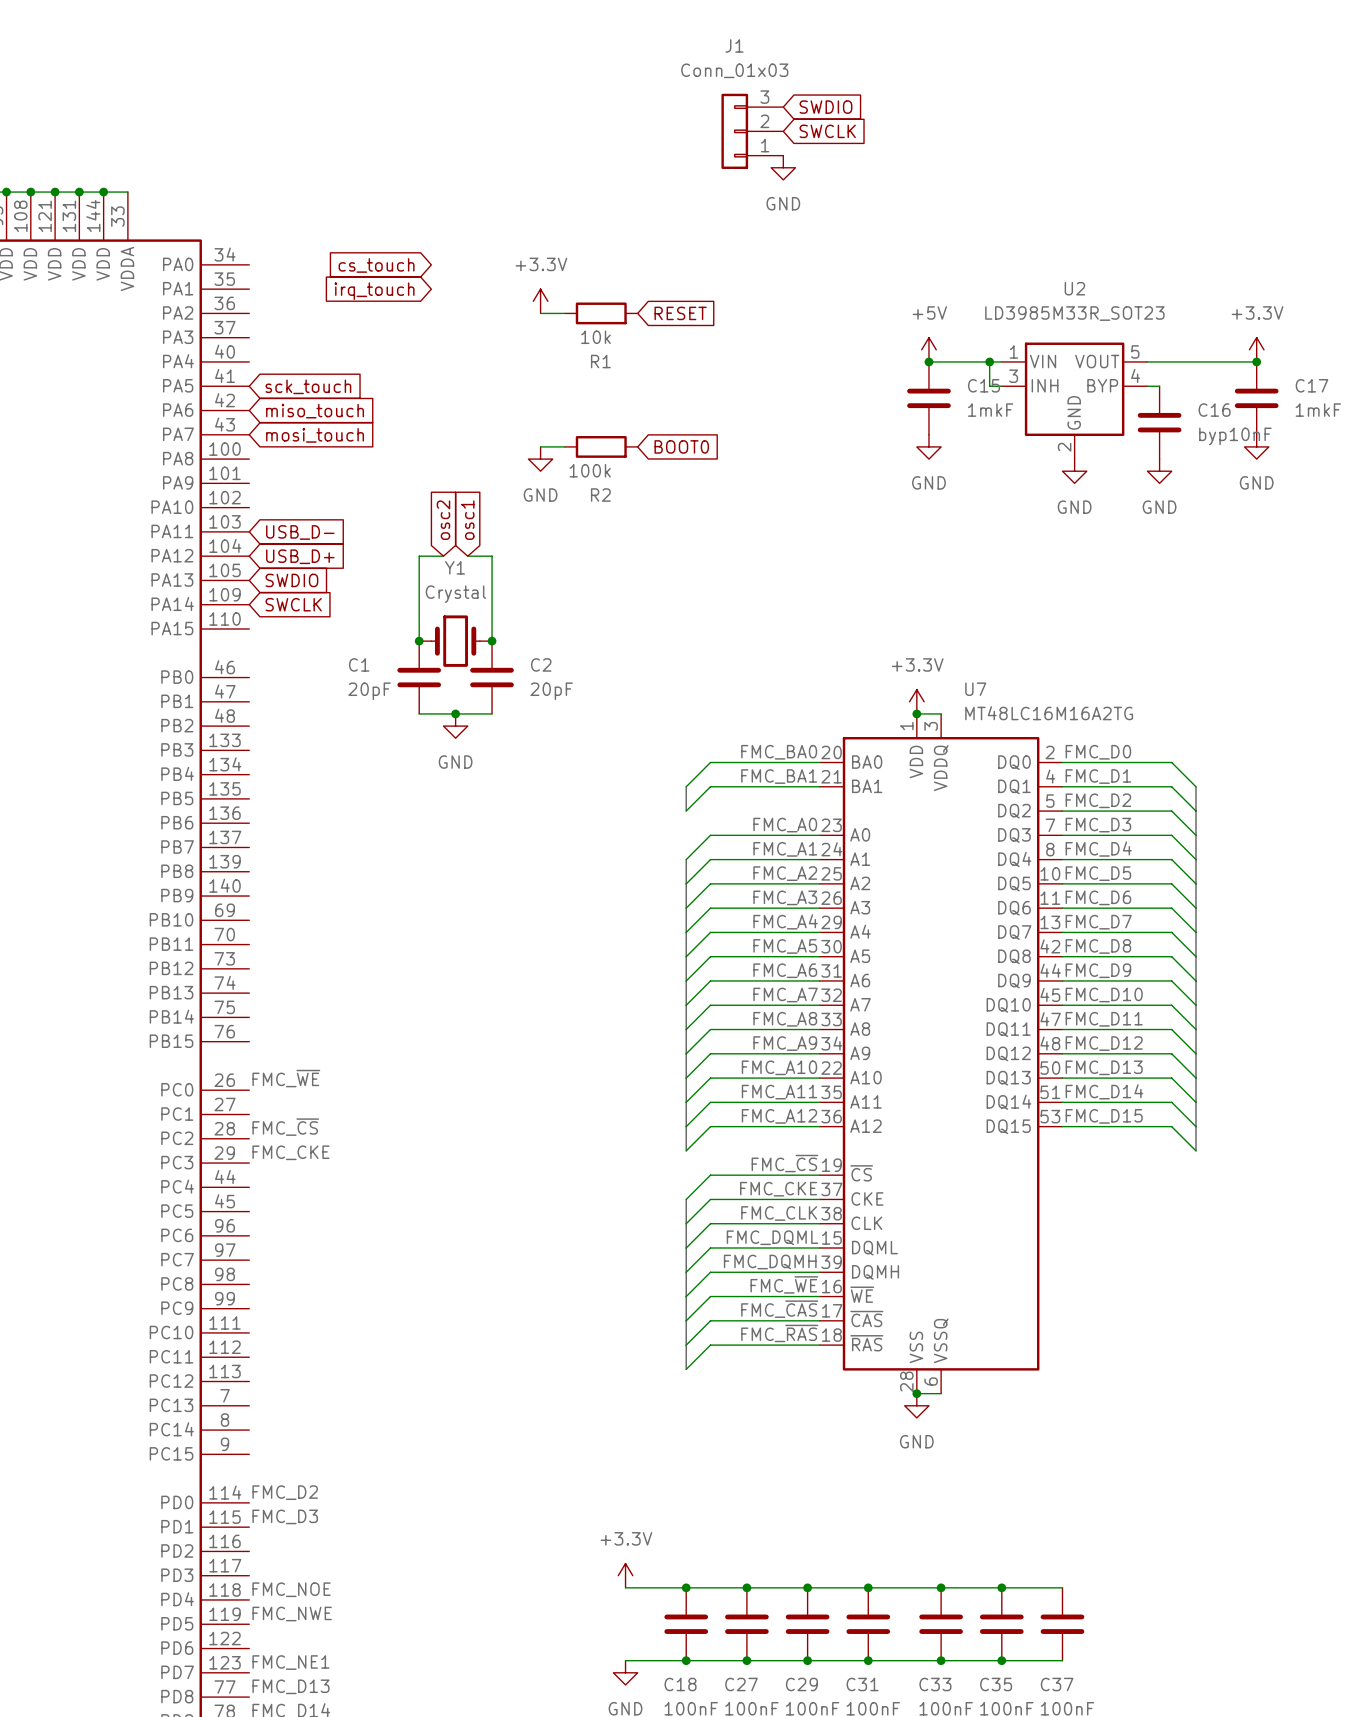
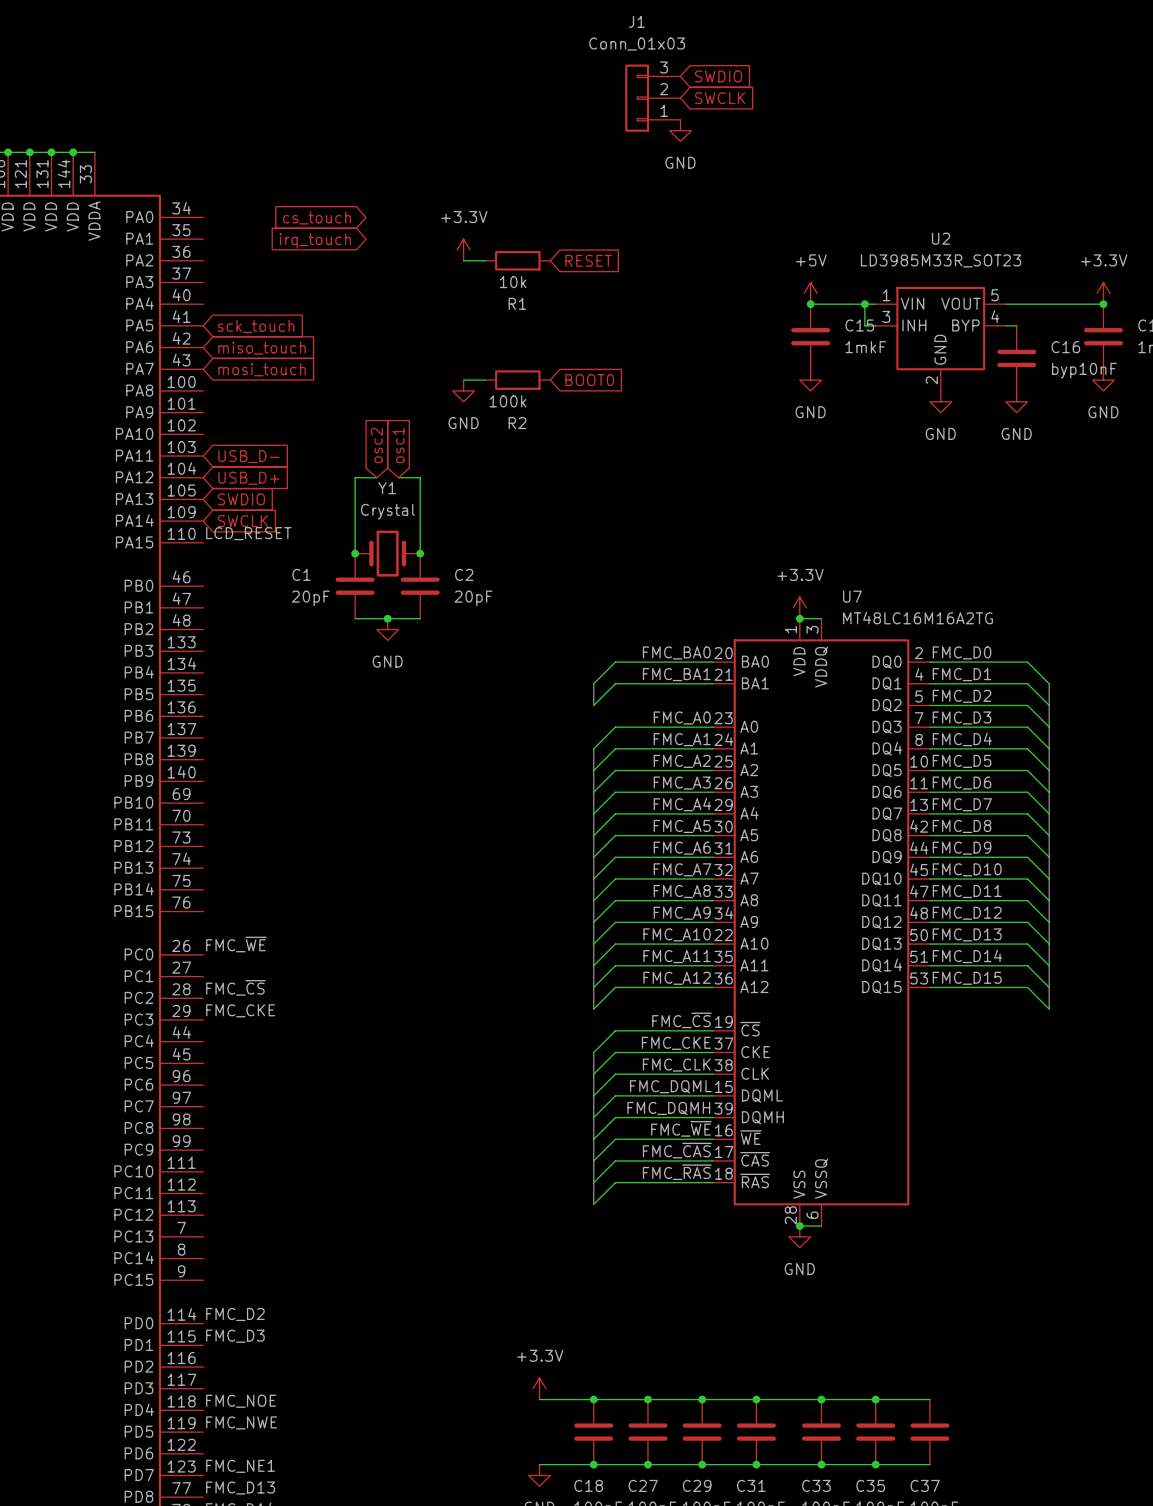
label: none -> LCD_RESET (248, 533)

